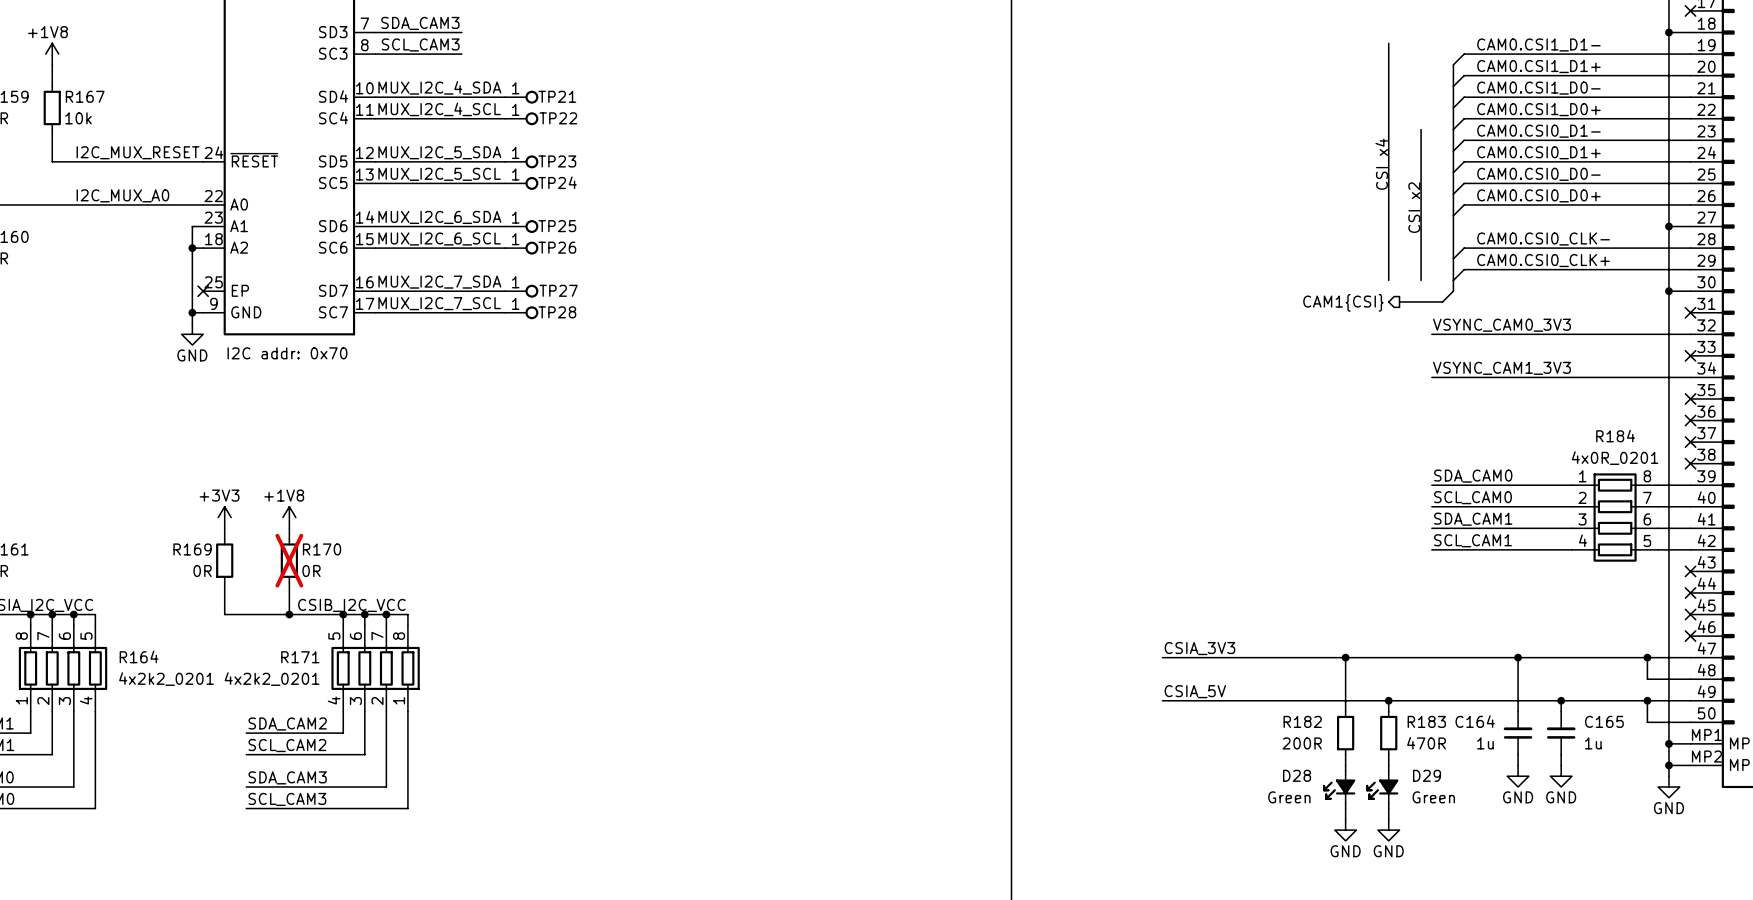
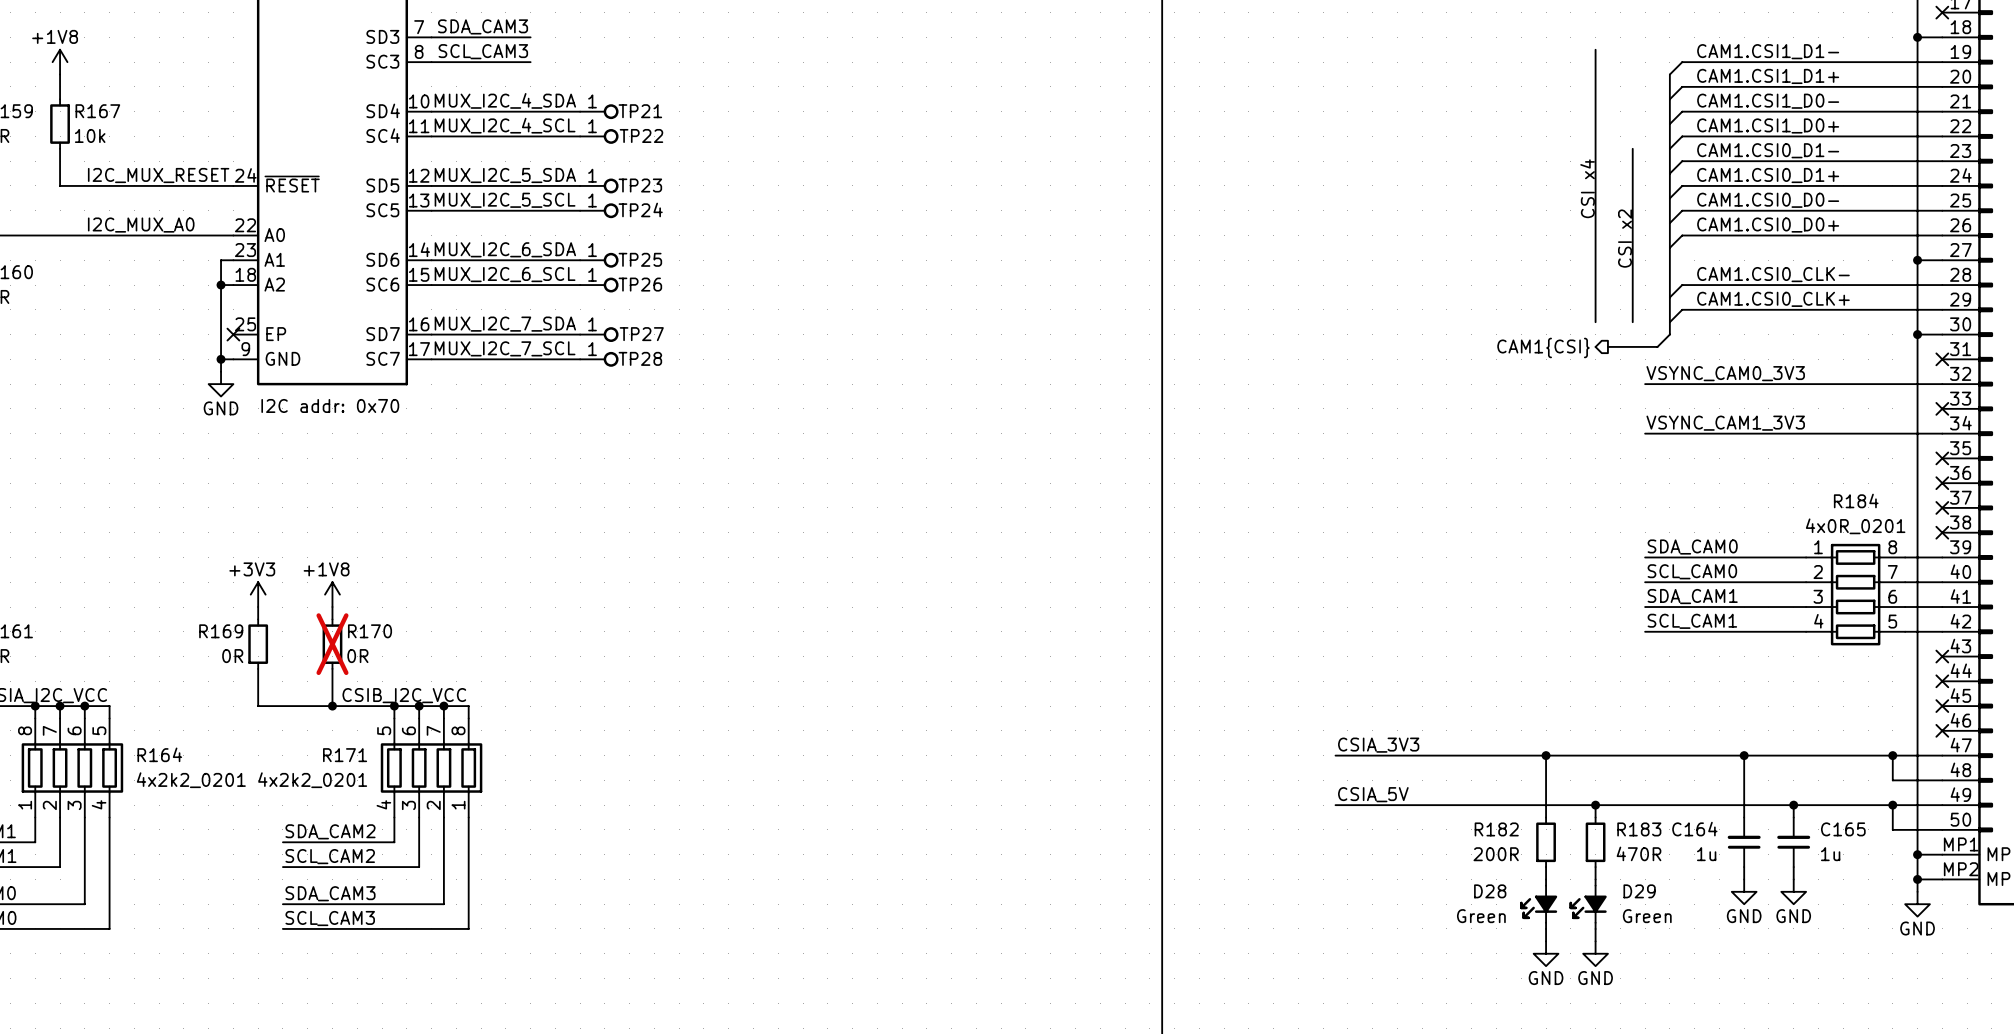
label: CAM0.CSI1_D1- (1538, 44) -> CAM1.CSI1_D1- (1768, 51)
label: CAM0.CSI1_D1+ (1538, 66) -> CAM1.CSI1_D1+ (1768, 76)
label: CAM0.CSI1_D0- (1538, 88) -> CAM1.CSI1_D0- (1768, 101)
label: CAM0.CSI1_D0+ (1538, 109) -> CAM1.CSI1_D0+ (1768, 125)
label: CAM0.CSI0_D1- (1538, 131) -> CAM1.CSI0_D1- (1768, 150)
label: CAM0.CSI0_D1+ (1538, 152) -> CAM1.CSI0_D1+ (1768, 175)
label: CAM0.CSI0_D0- (1538, 174) -> CAM1.CSI0_D0- (1768, 200)
label: CAM0.CSI0_D0+ (1538, 195) -> CAM1.CSI0_D0+ (1768, 225)
label: CAM0.CSI0_CLK- (1543, 238) -> CAM1.CSI0_CLK- (1773, 274)
label: CAM0.CSI0_CLK+ (1543, 260) -> CAM1.CSI0_CLK+ (1773, 299)

